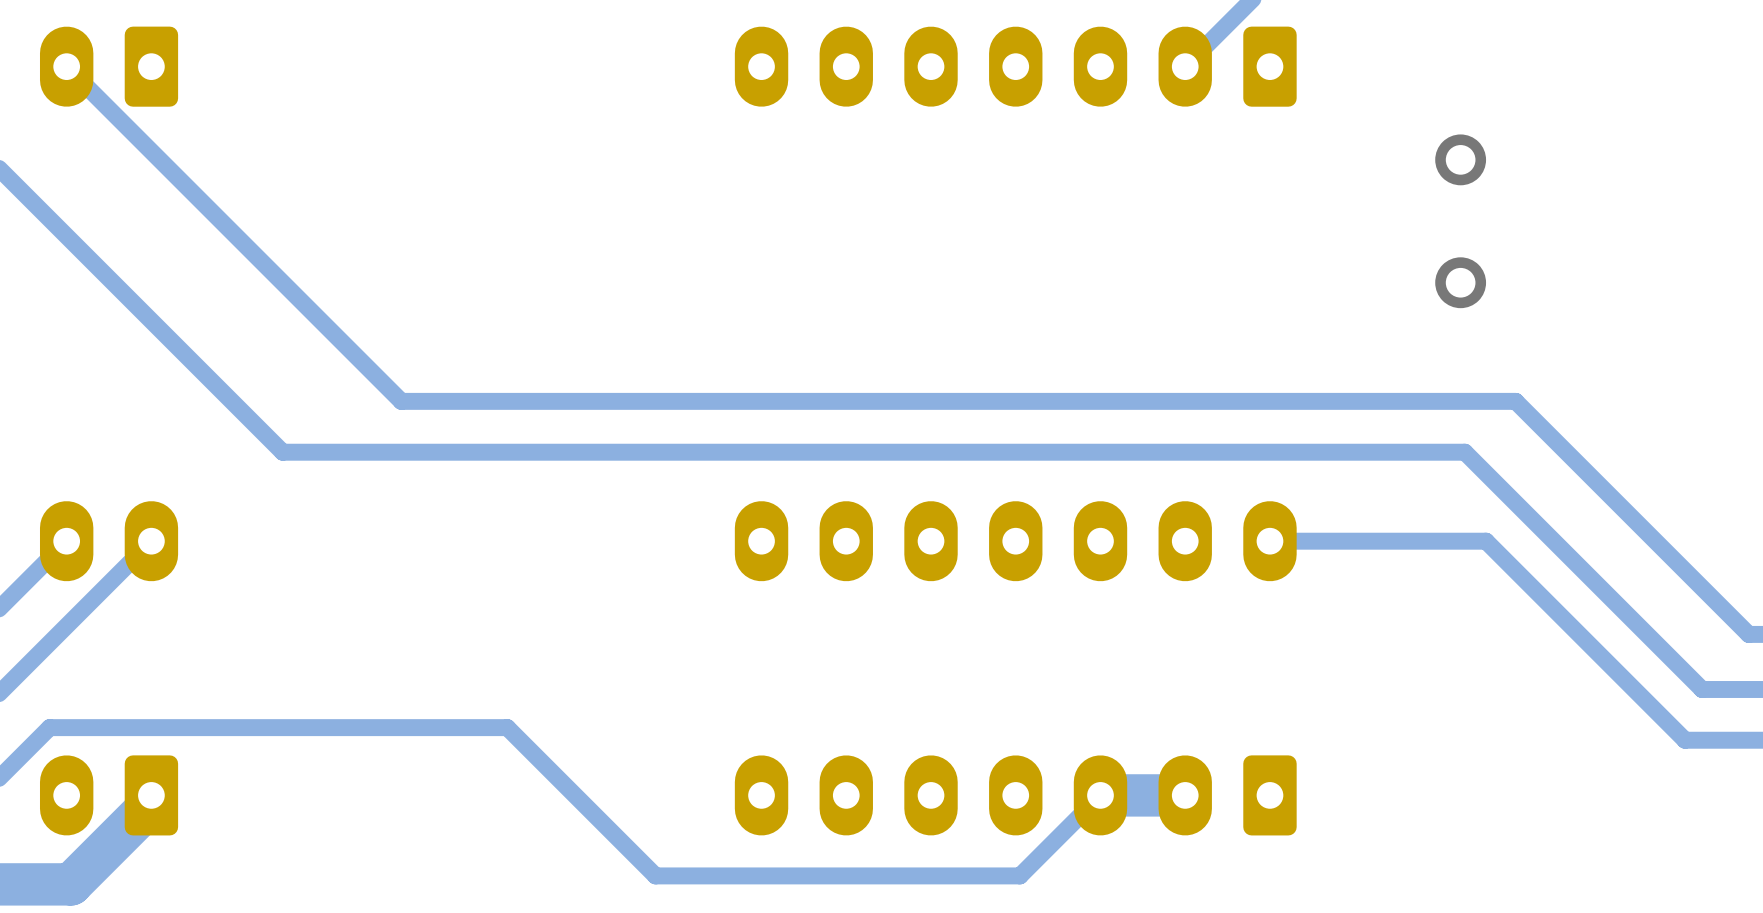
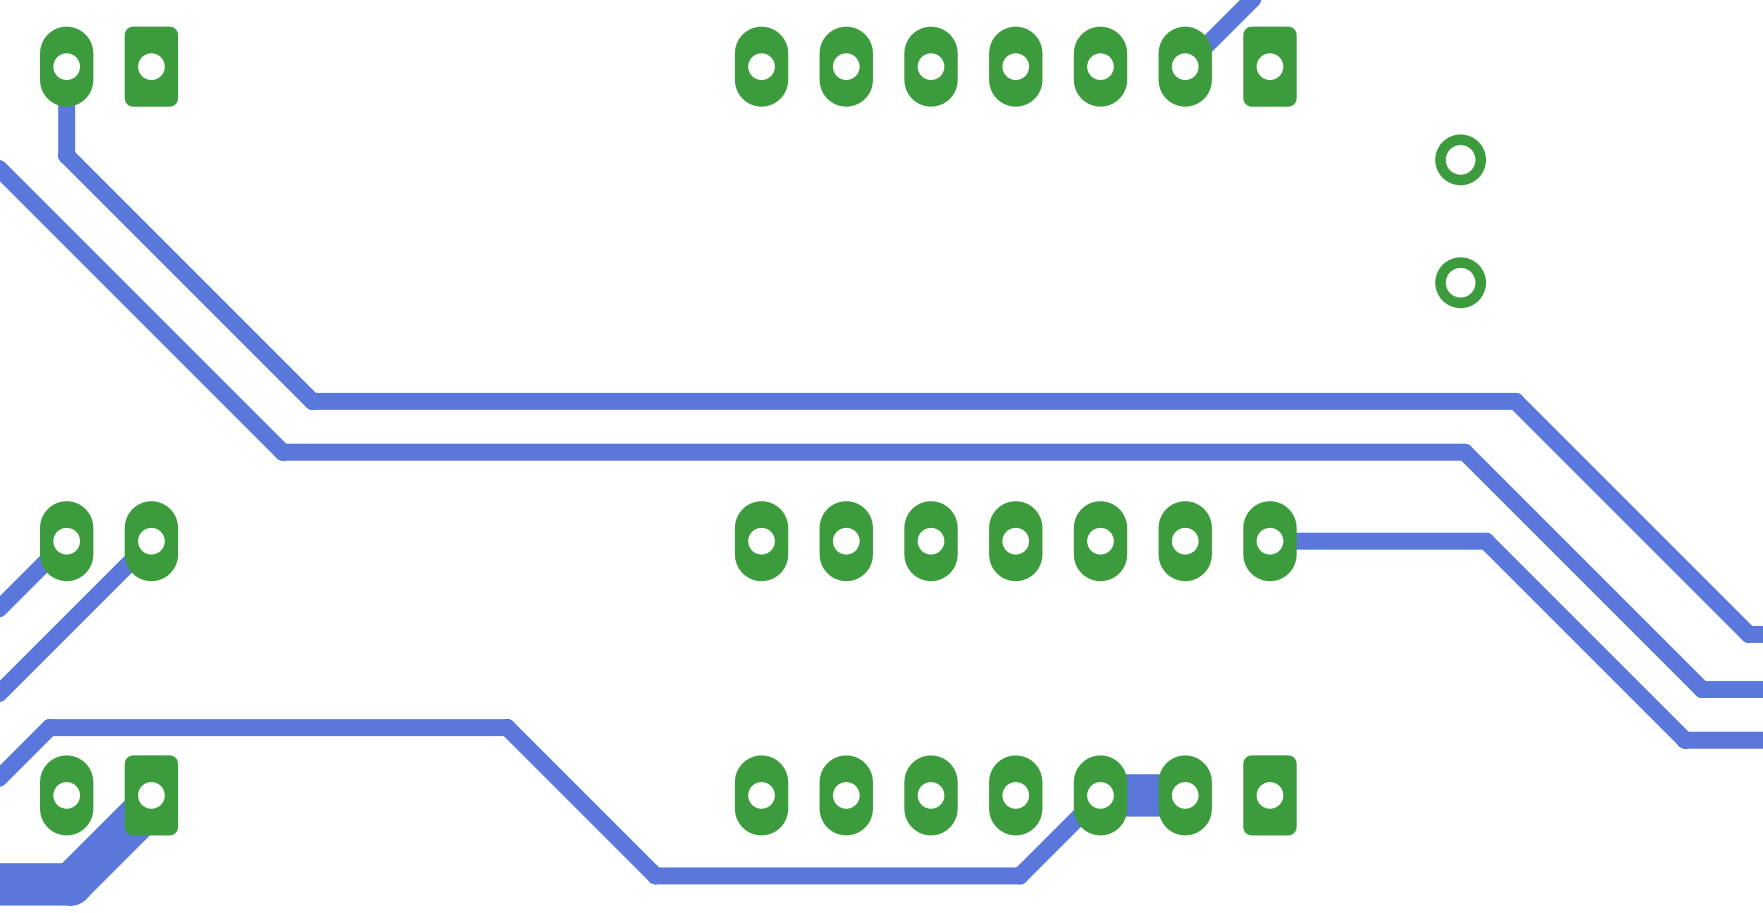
track: (66, 66) (401, 401) -> (66, 66) (66, 155) (312, 401) (401, 401)

